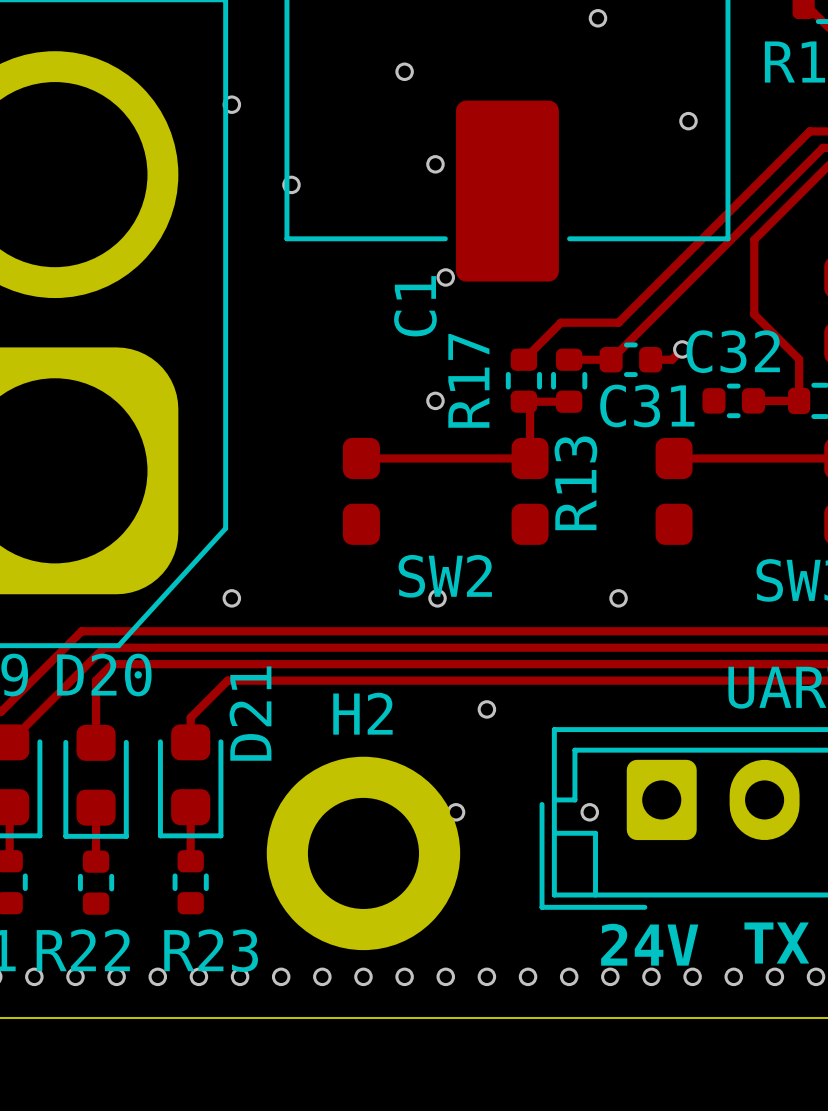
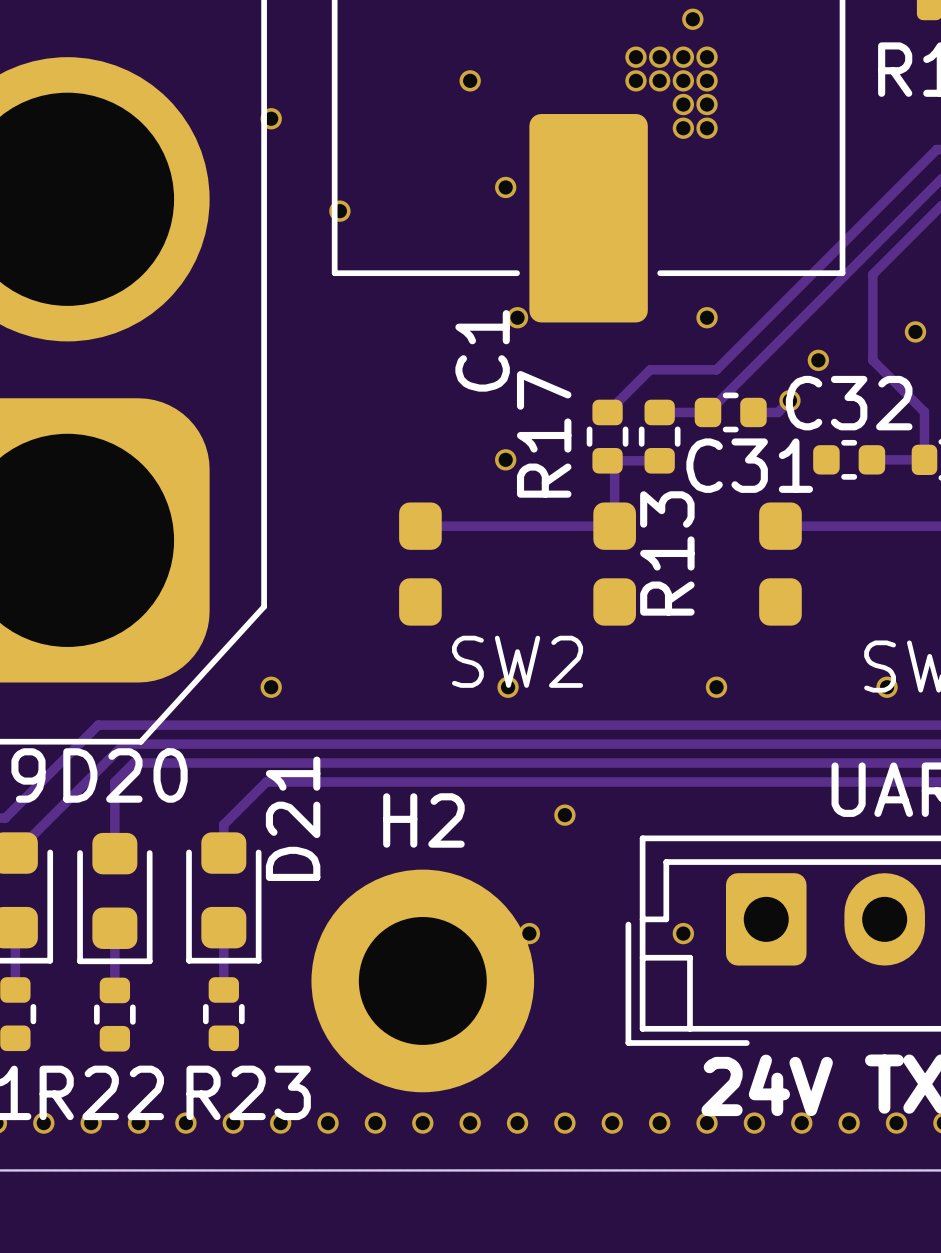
via: none -> (635, 57)
via: none -> (659, 57)
via: none -> (683, 57)
via: none -> (707, 57)
via: none -> (635, 80)
via: none -> (659, 80)
via: none -> (683, 80)
via: none -> (707, 80)
via: none -> (683, 104)
via: none -> (707, 104)
via: none -> (683, 128)
via: none -> (707, 128)
via: (688, 121) -> none
via: none -> (707, 317)
via: none -> (915, 331)
via: none -> (818, 360)
via: none -> (887, 687)

